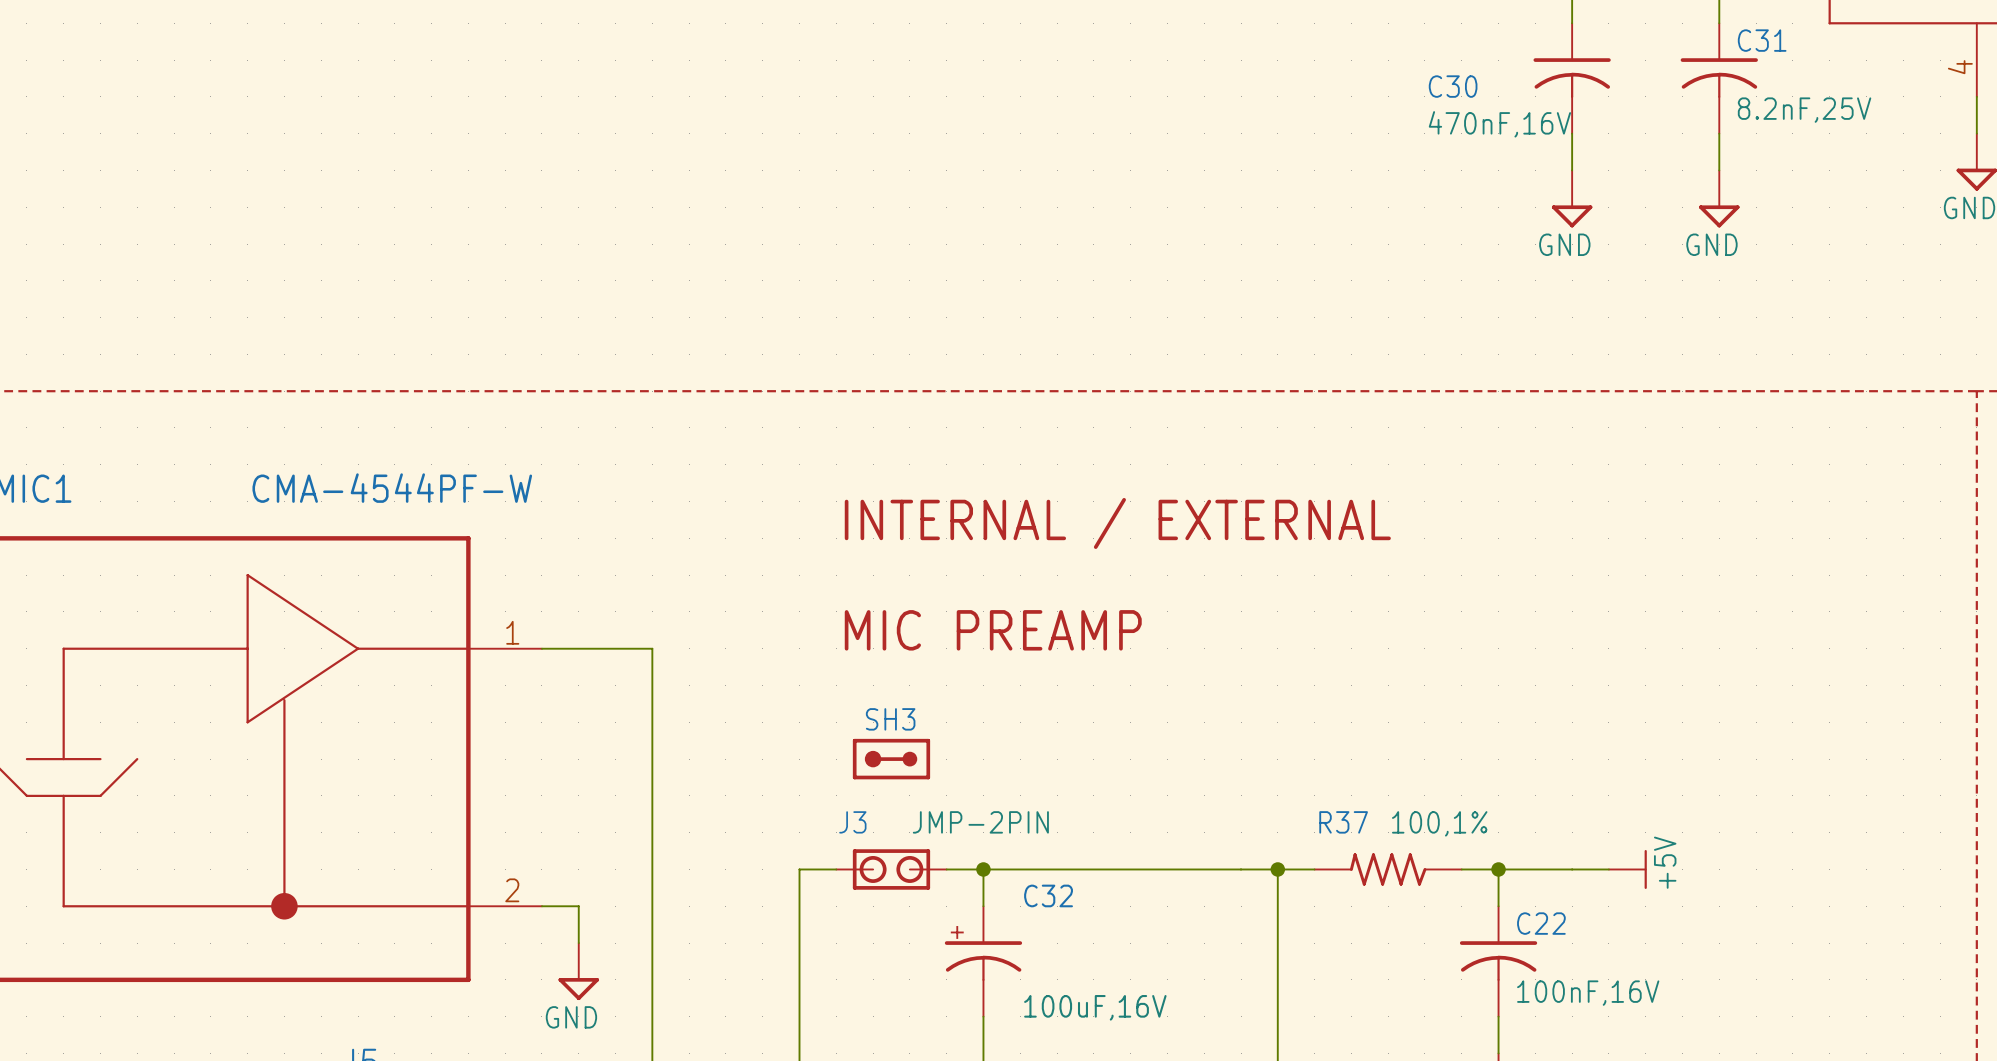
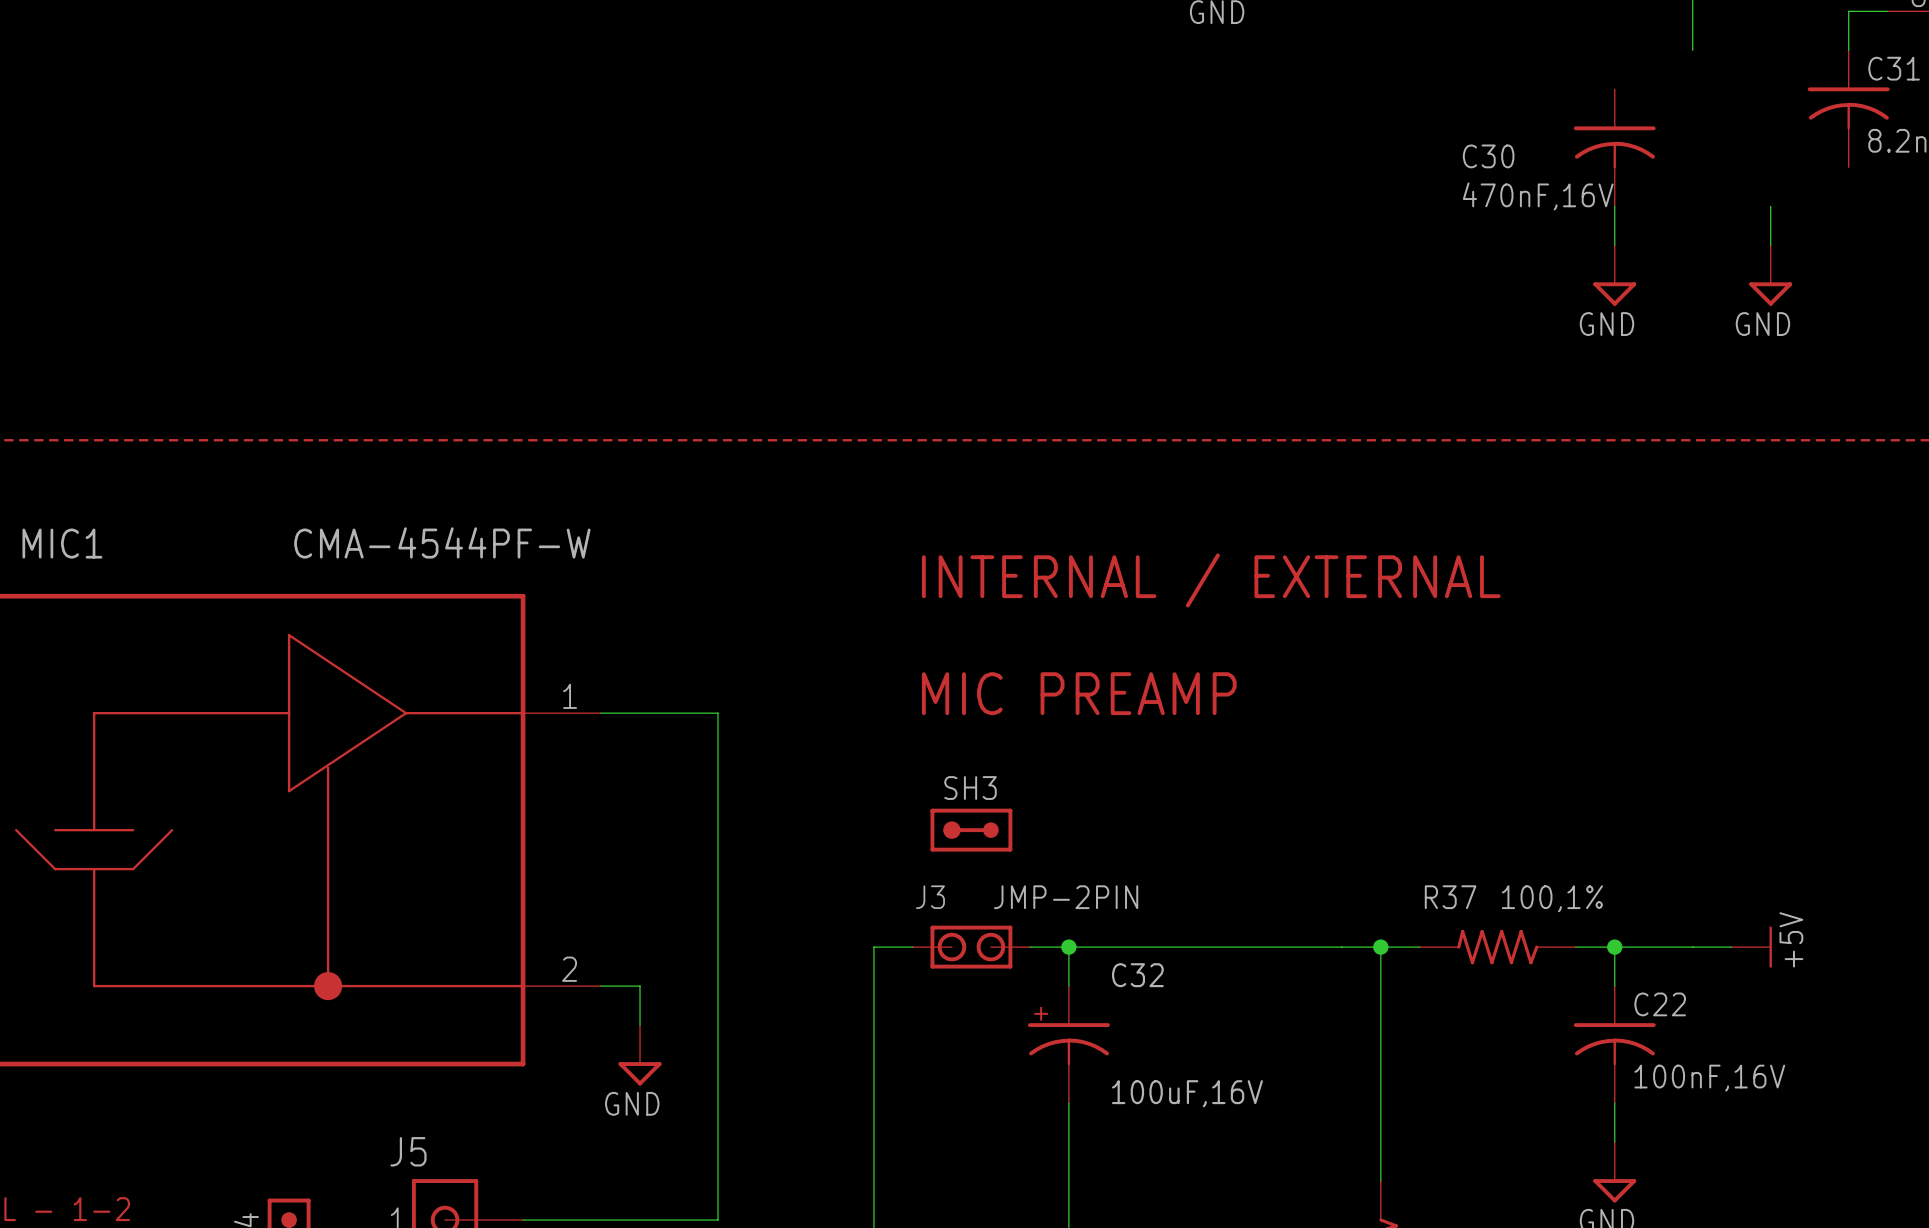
C30 position: (1572, 78) -> (1614, 147)
wire: (1572, 133) (1572, 170) -> (1614, 206) (1614, 245)
wire: (1719, 133) (1719, 170) -> (1770, 206) (1770, 245)
power symbol: GND (1572, 198) -> none
power symbol: GND (1719, 198) -> none
power symbol: none -> GND (1614, 275)
power symbol: none -> GND (1770, 275)

